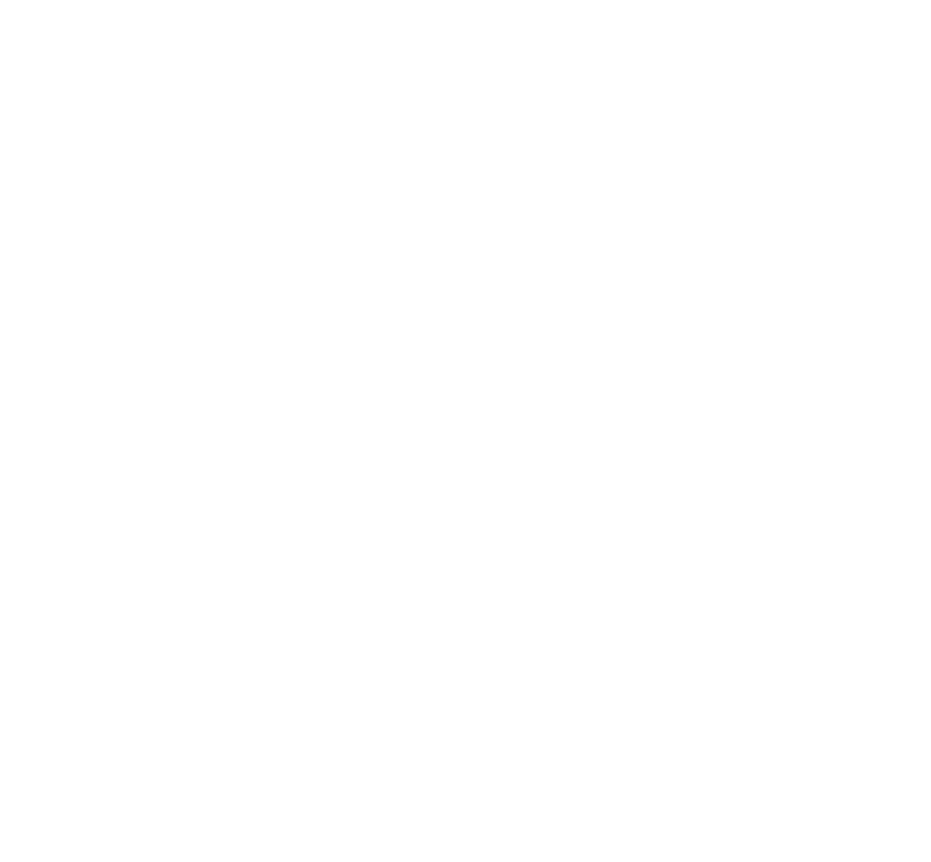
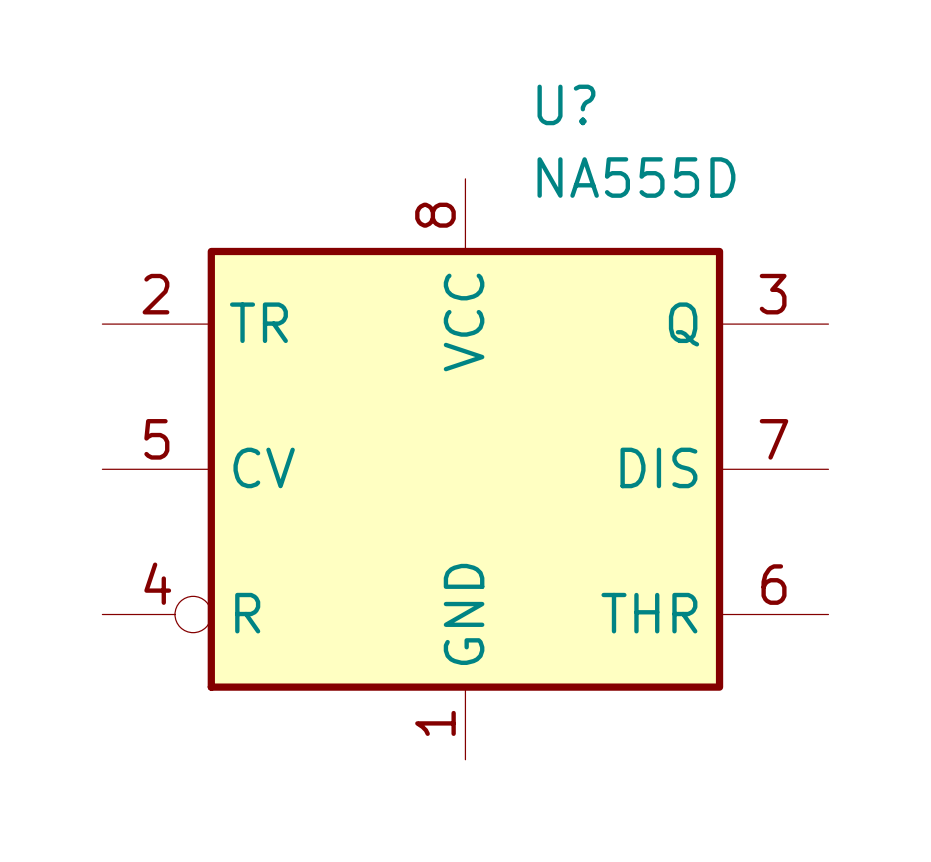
U?: none -> NA555D (465, 469)

